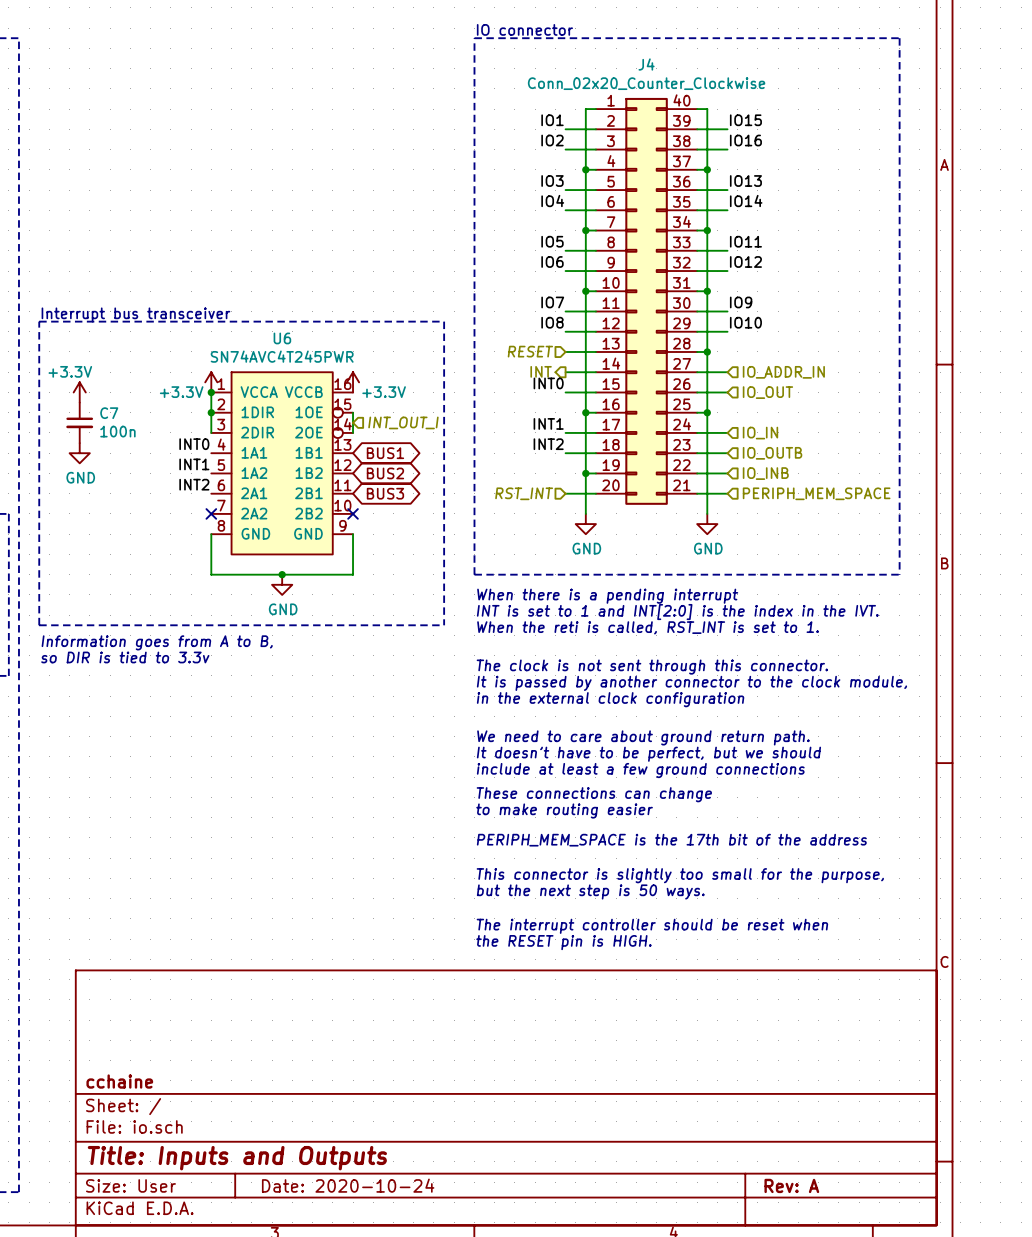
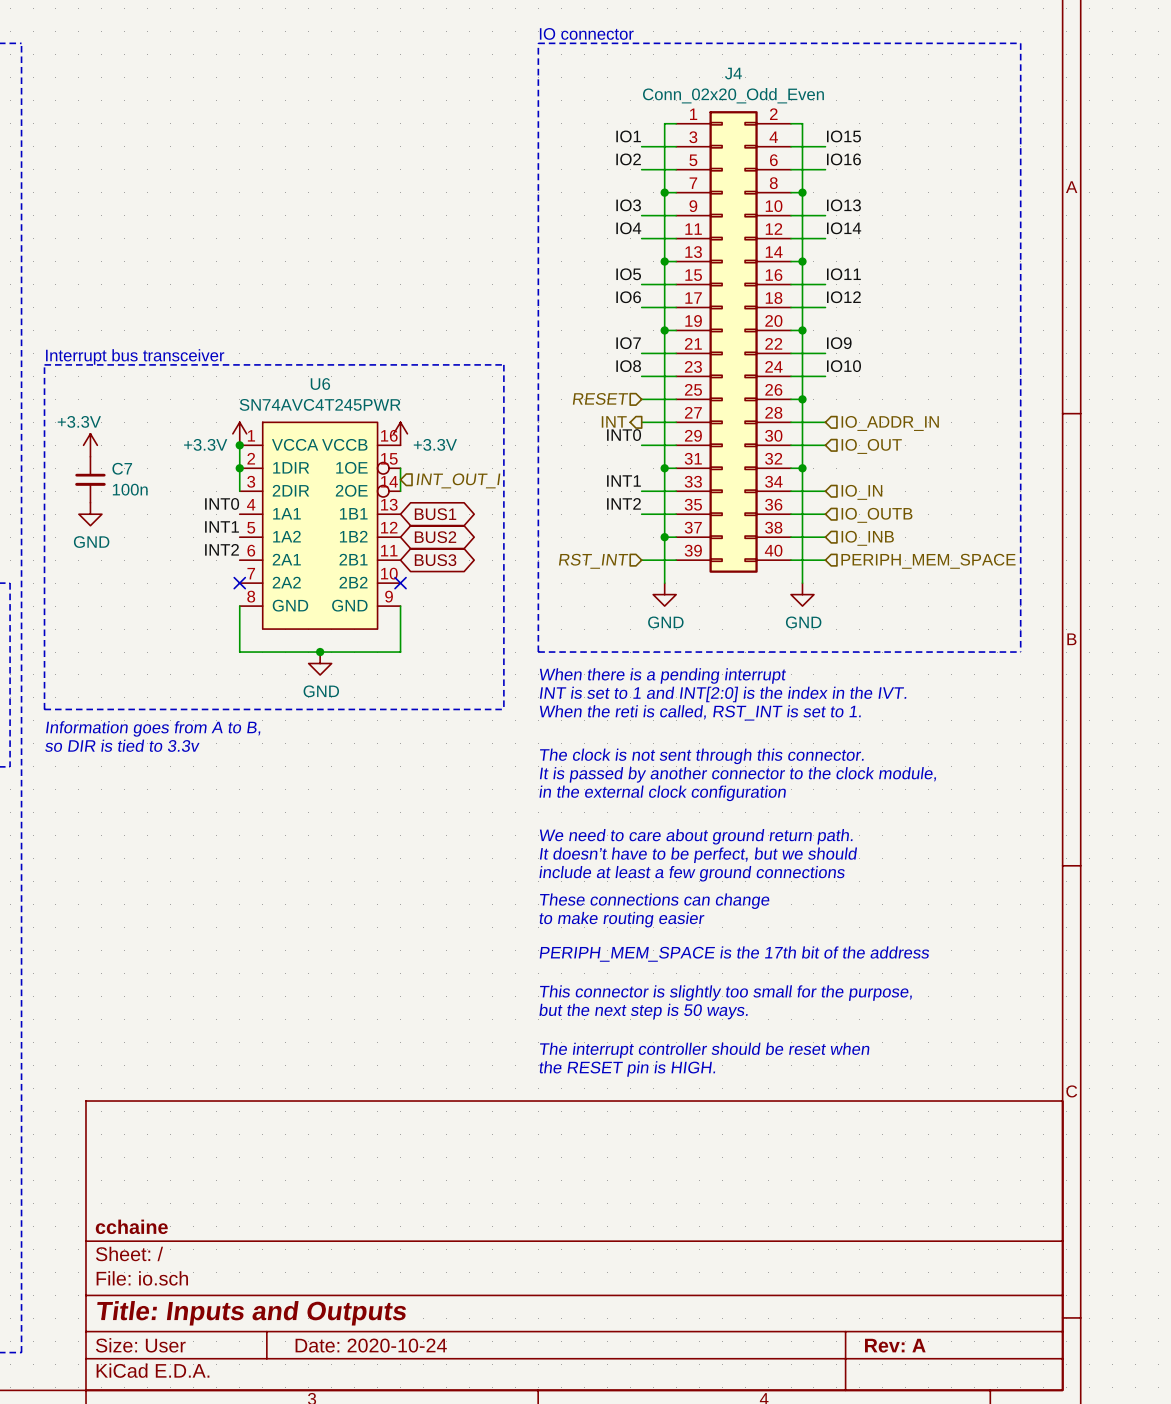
J4 value: Conn_02x20_Counter_Clockwise (646, 83) -> Conn_02x20_Odd_Even (733, 95)
J4 symbol: [595, 97, 698, 505] -> [676, 111, 792, 573]

